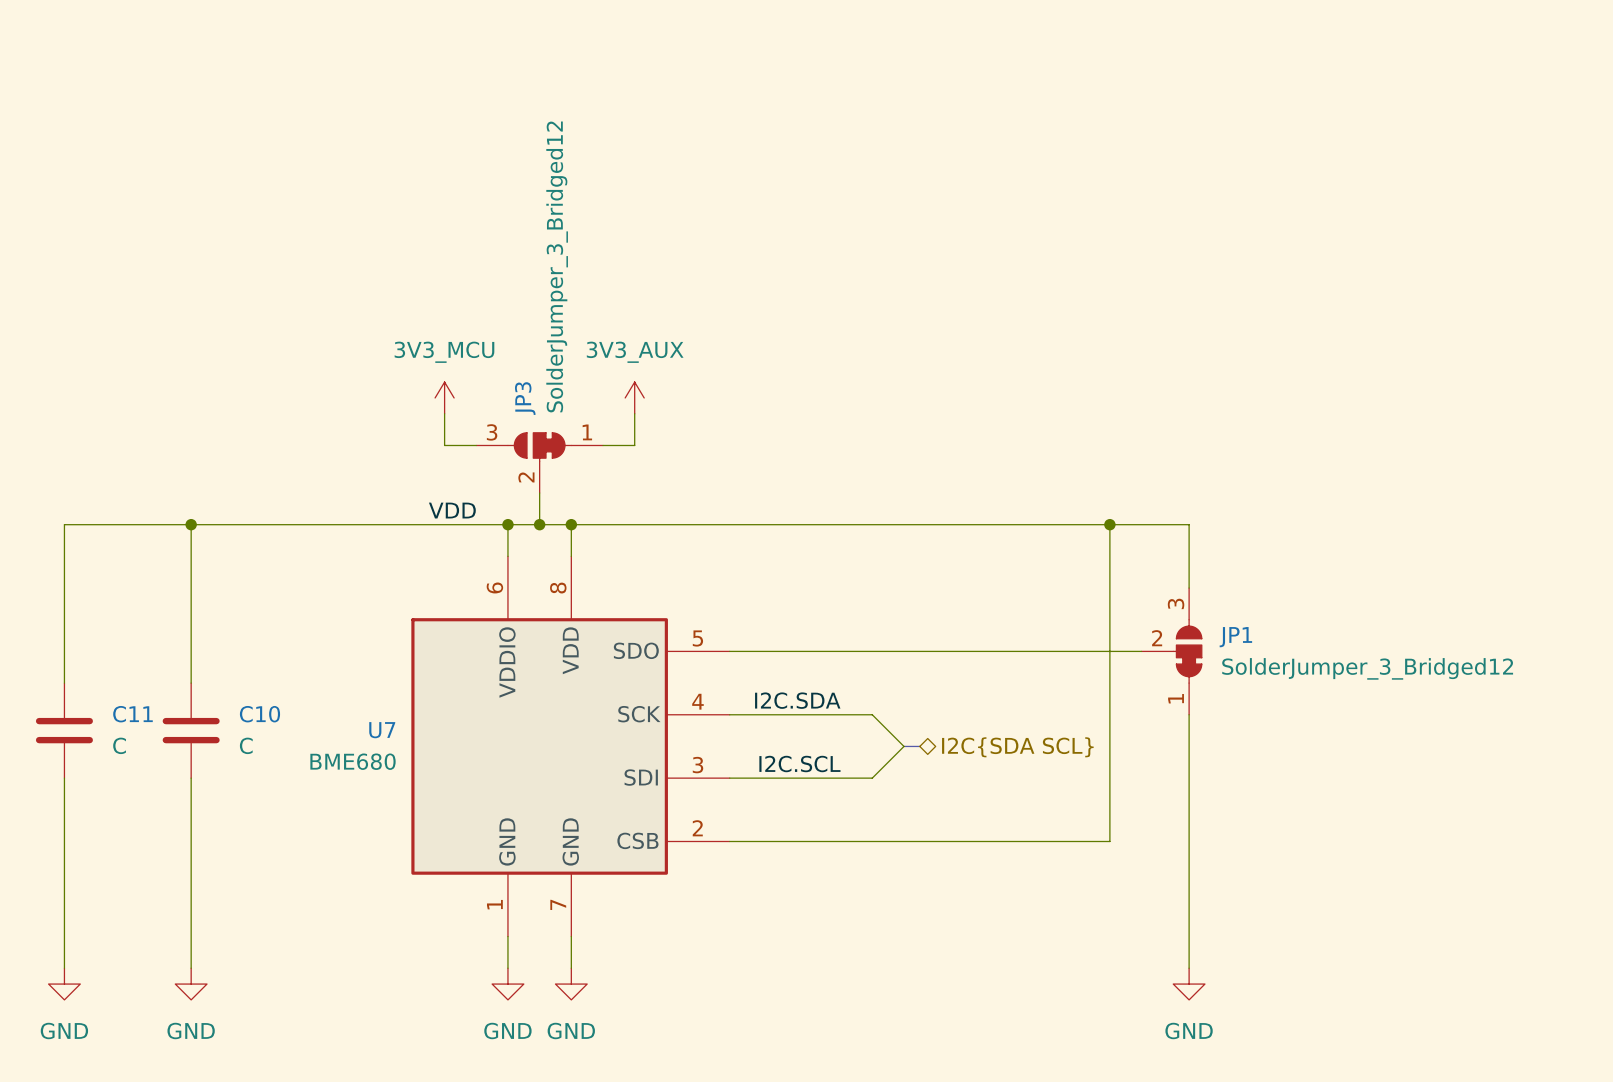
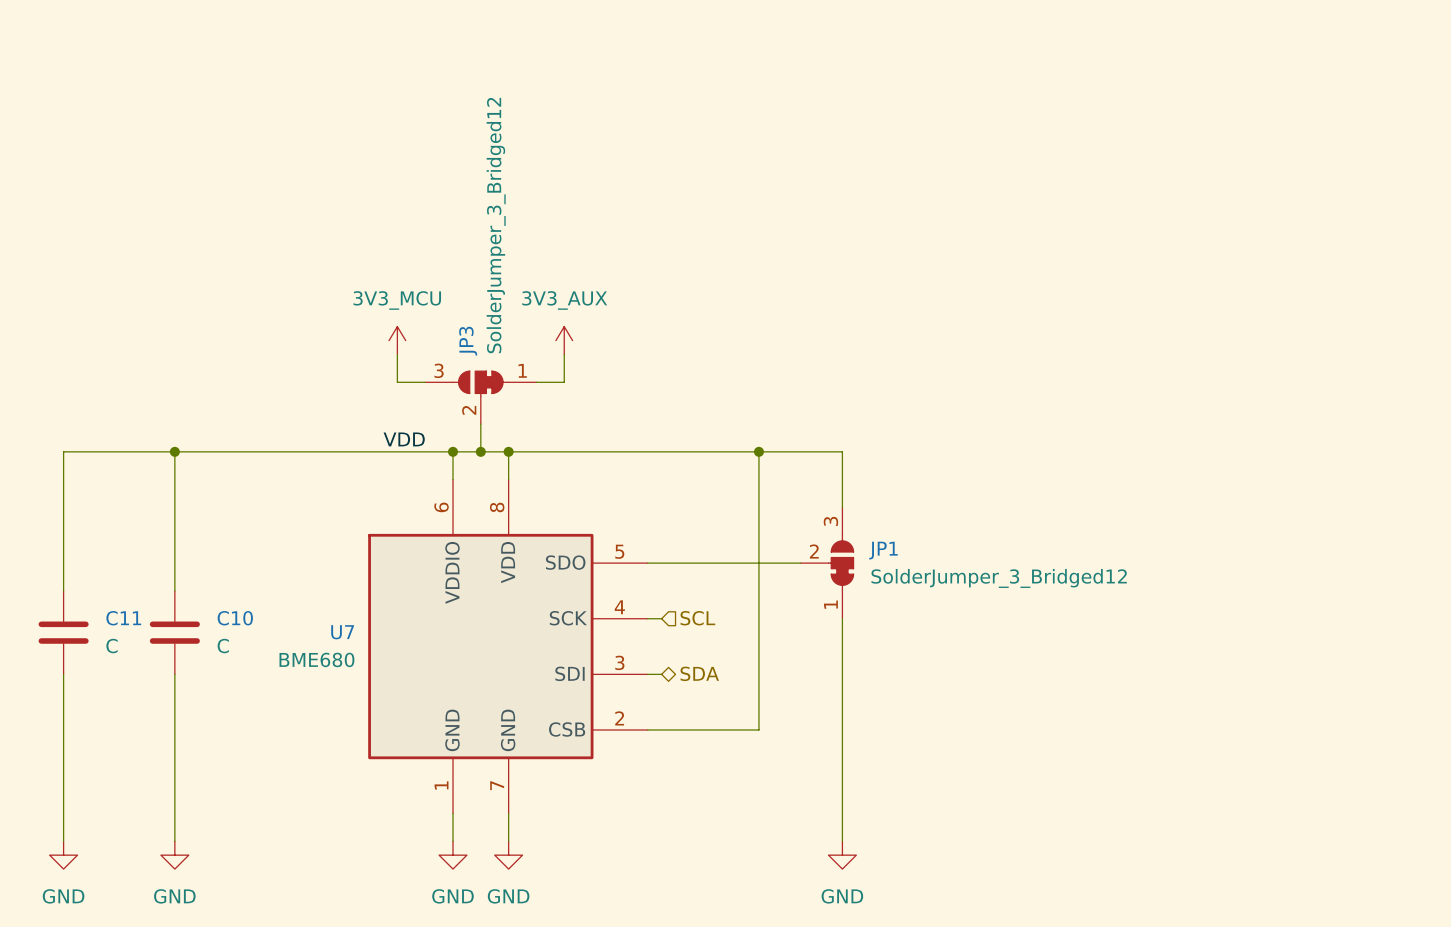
junction: none -> (758, 451)
wire: (951, 524) (1189, 524) (1189, 588) -> (842, 451) (842, 507)
wire: (1109, 524) (1109, 841) (856, 841) -> (758, 451) (758, 729)
junction: (1109, 524) -> none
wire: (903, 651) (1141, 651) -> none
JP1 position: (1171, 651) -> (827, 563)
label: I2C.SDA (797, 700) -> none
wire: (745, 714) (872, 714) (903, 746) (872, 778) (745, 778) -> none
hierarchical label: none -> SCL (697, 618)
wire: (1189, 714) (1189, 968) -> (842, 618) (842, 841)
bus: (903, 746) (919, 746) -> none
hierarchical label: I2C{SDA SCL} (1017, 747) -> none
label: I2C.SCL (799, 764) -> none
hierarchical label: none -> SDA (699, 673)
power symbol position: GND (1189, 984) -> GND (842, 855)

